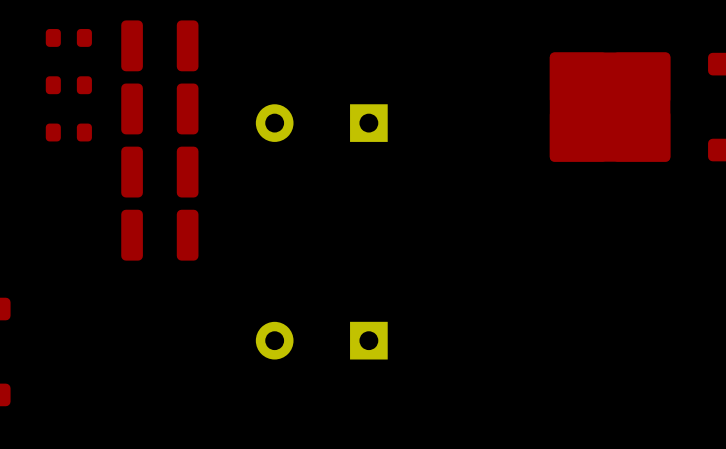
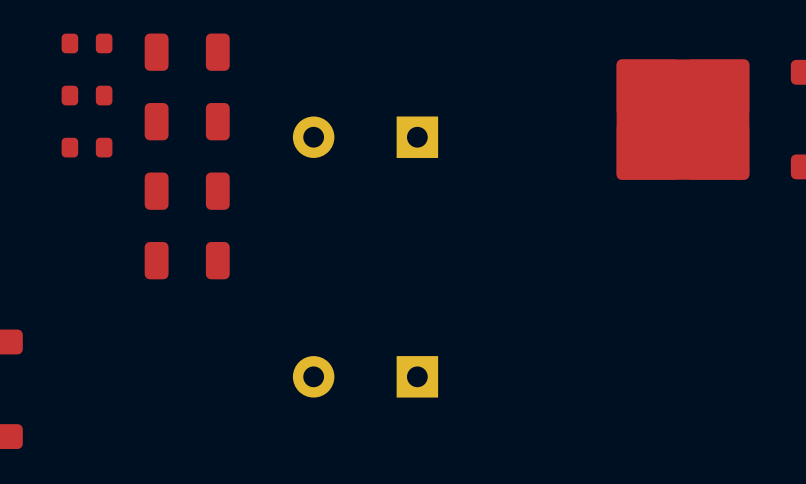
part footprint: [121, 20, 199, 72] -> [144, 33, 230, 71]
part footprint: [121, 83, 199, 135] -> [144, 103, 230, 141]
part footprint: [121, 146, 199, 198] -> [144, 172, 230, 210]
part footprint: [121, 209, 199, 261] -> [144, 241, 230, 280]

